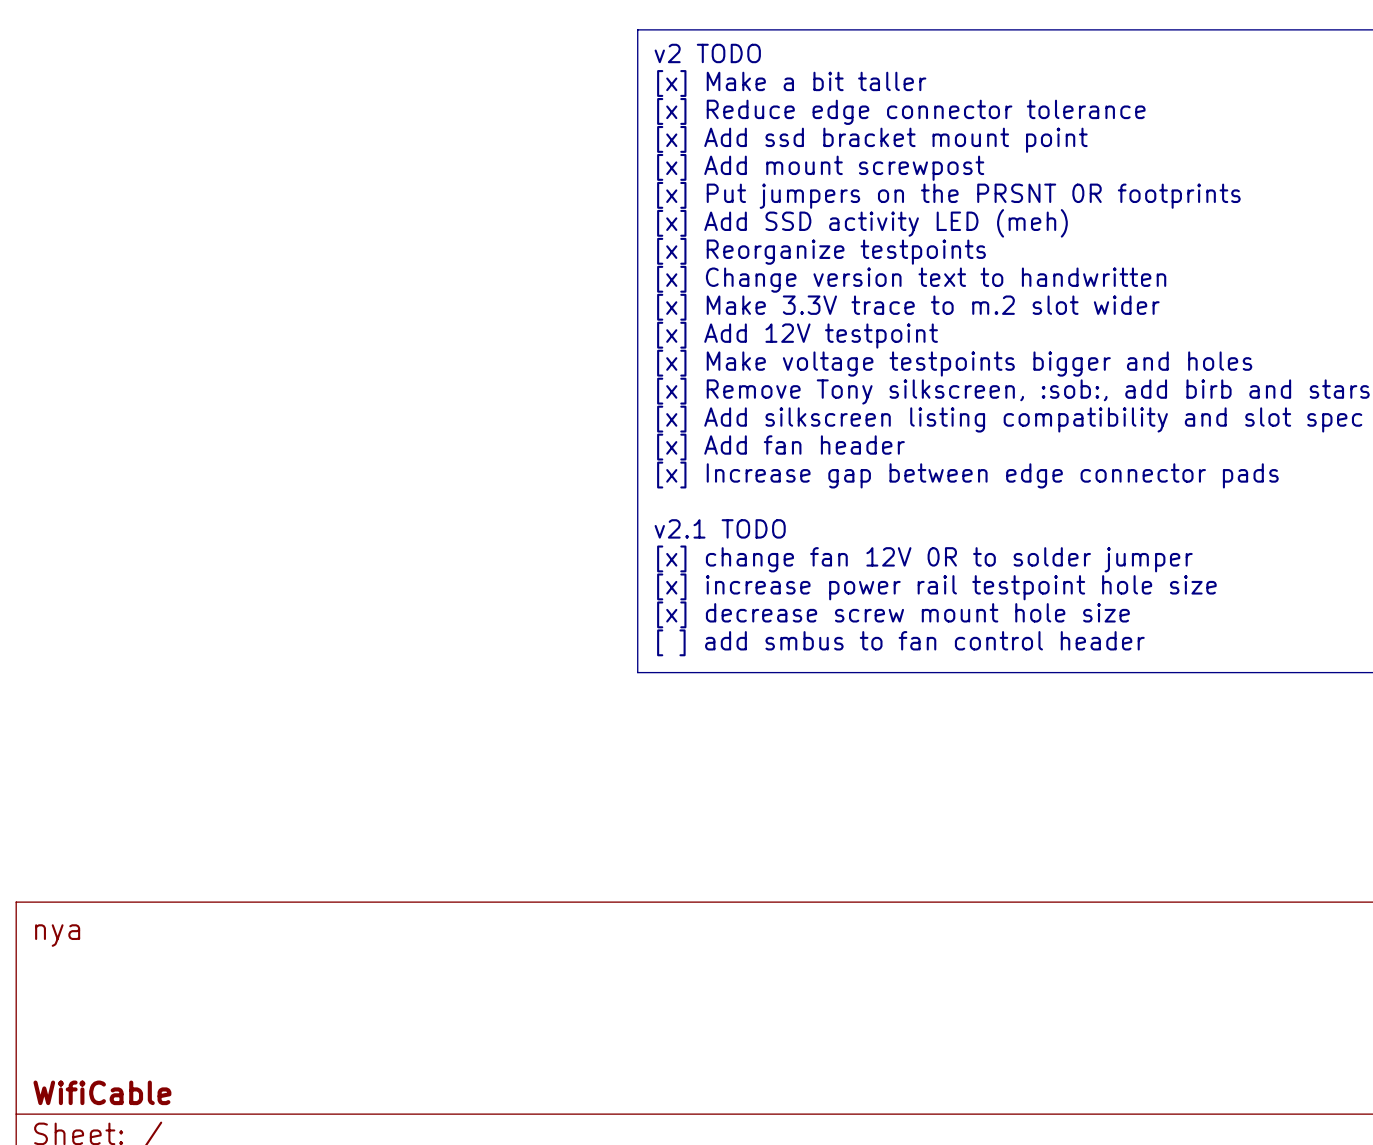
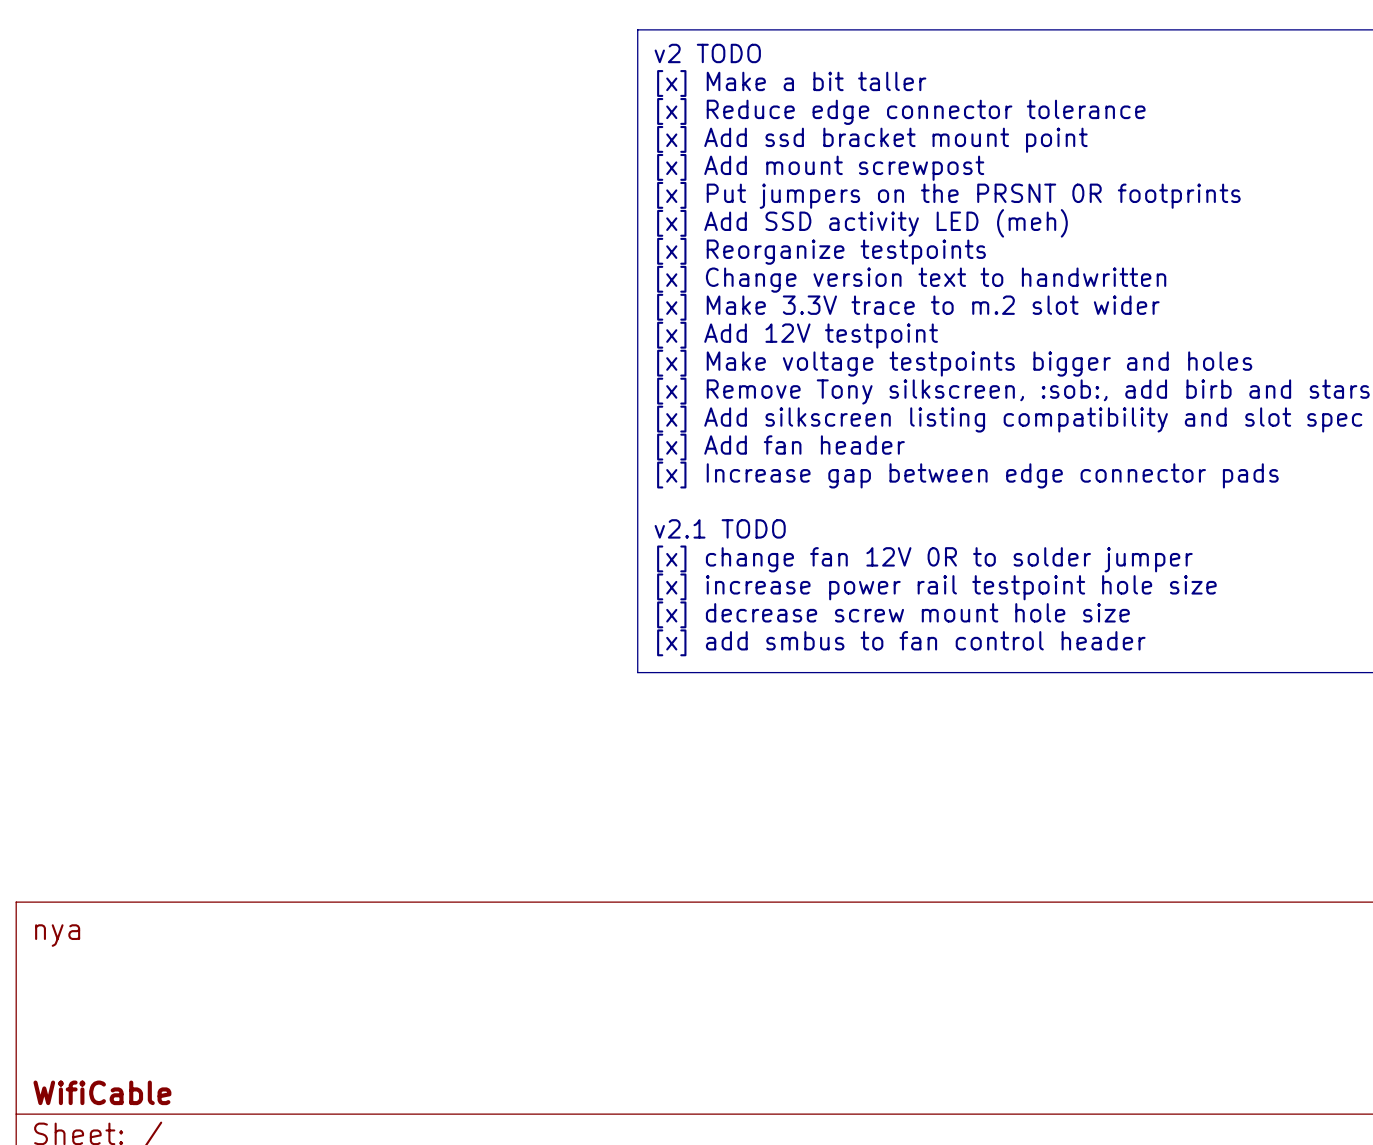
text: [ ] add smbus to fan control header (900, 642) -> [x] add smbus to fan control header (901, 642)

